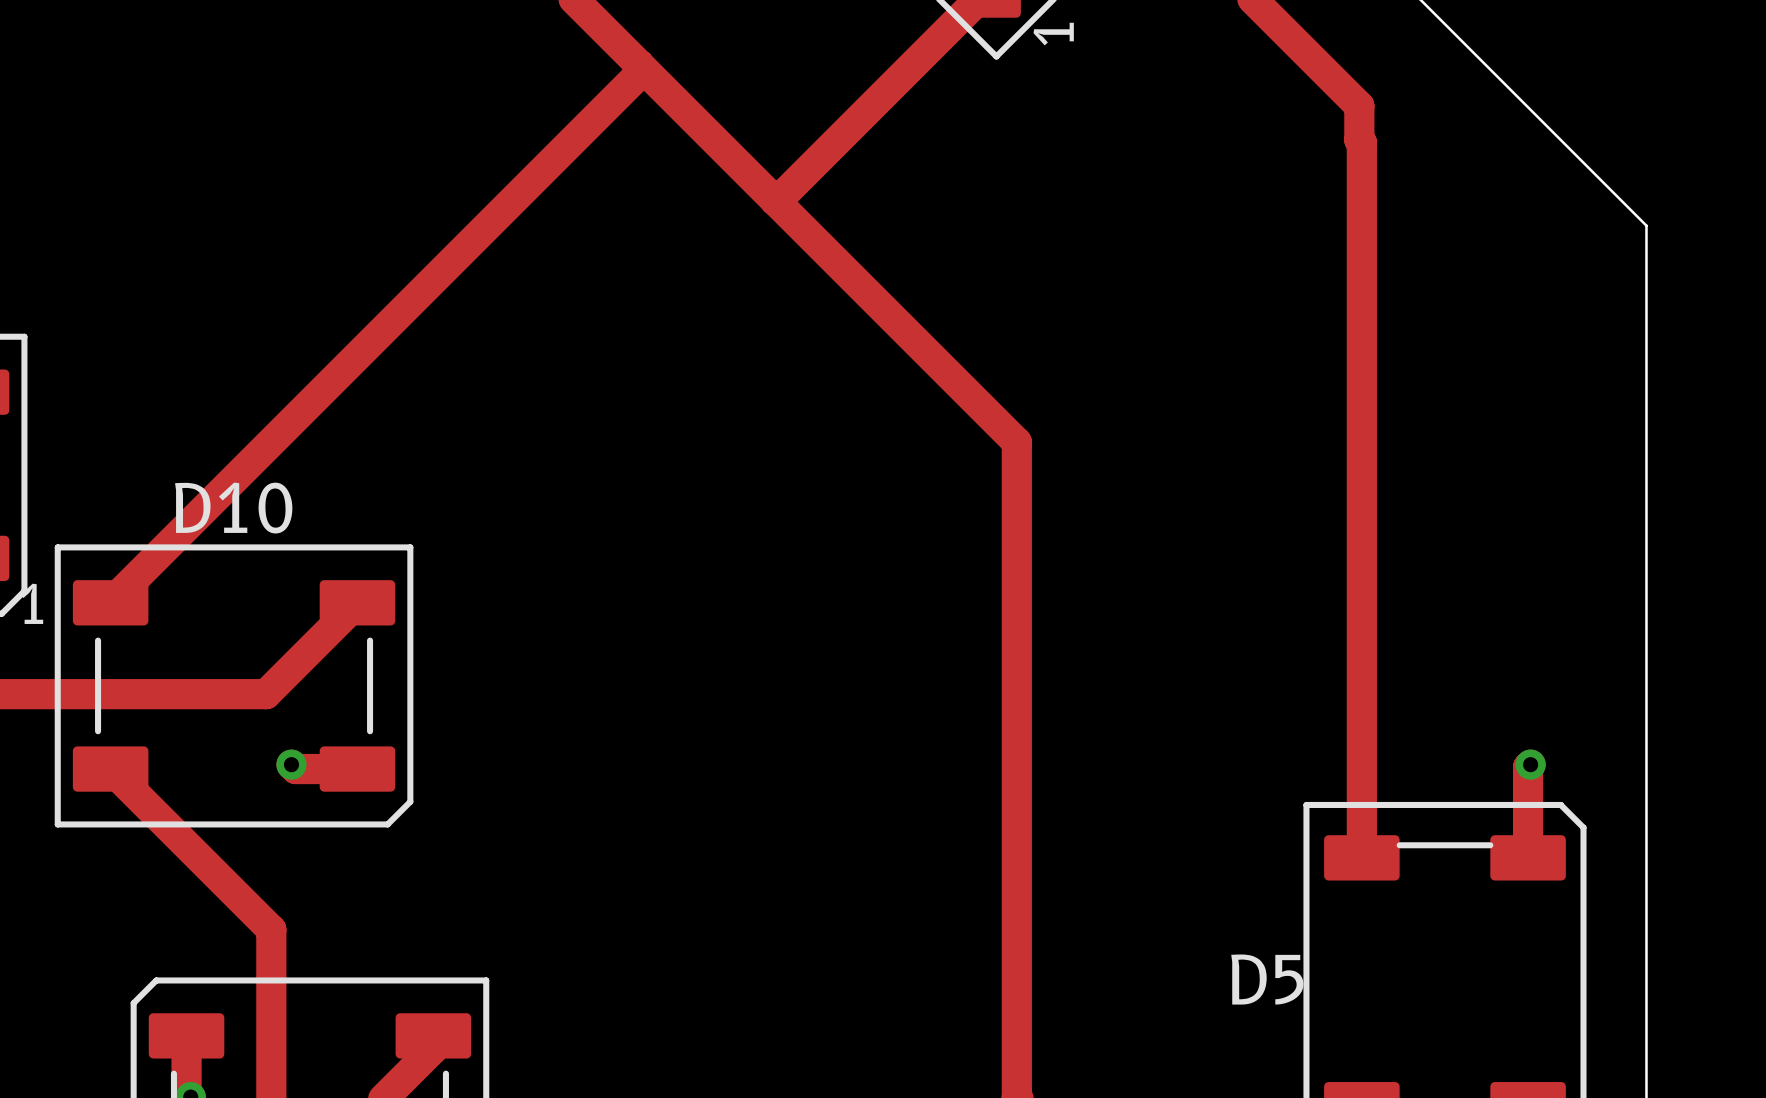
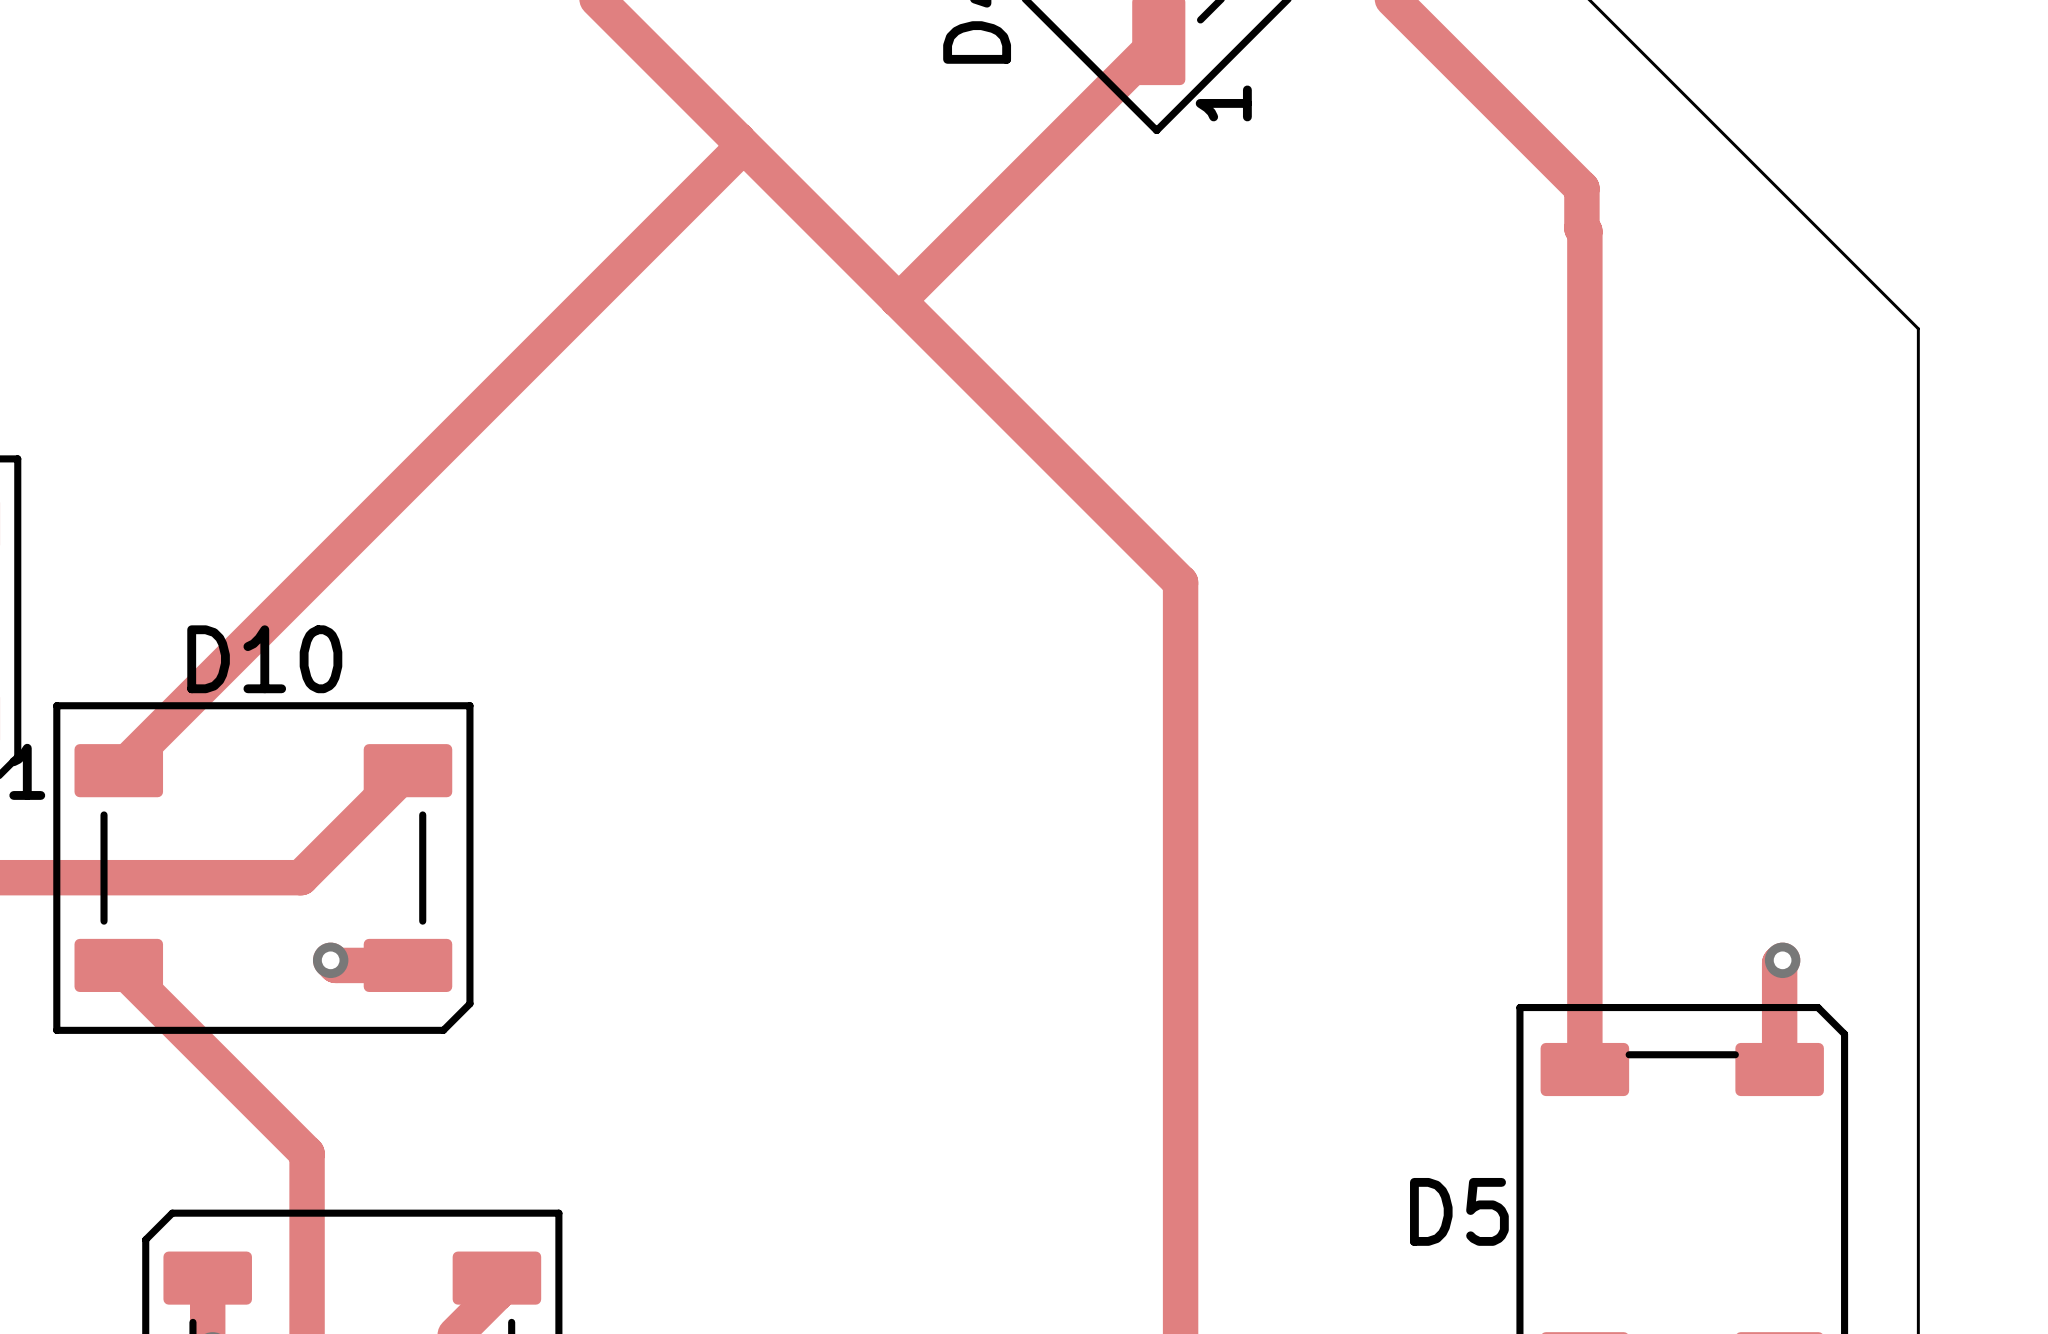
D5 name position: D5 (1267, 979) -> D5 (1459, 1211)

